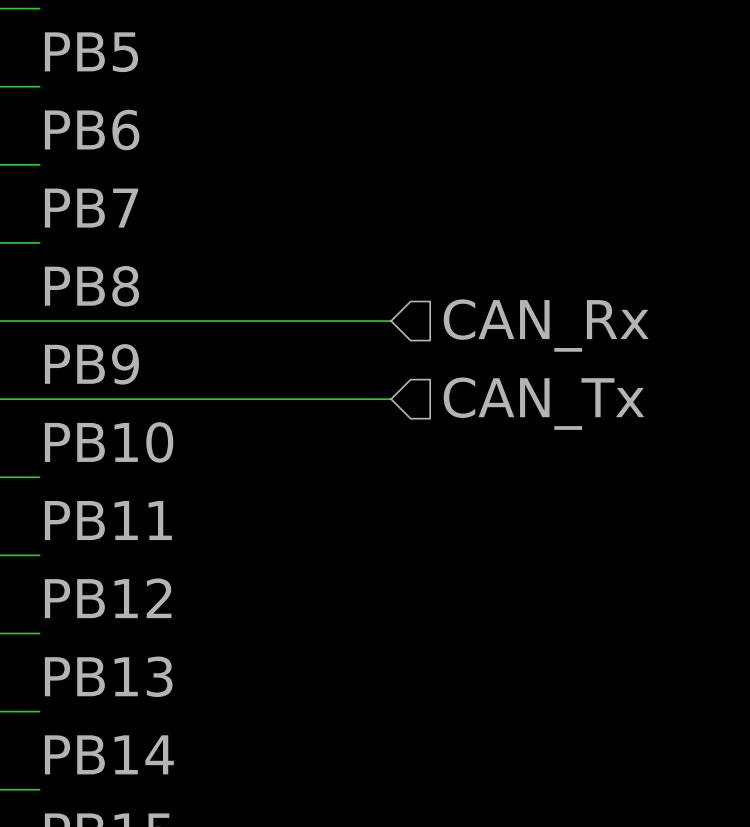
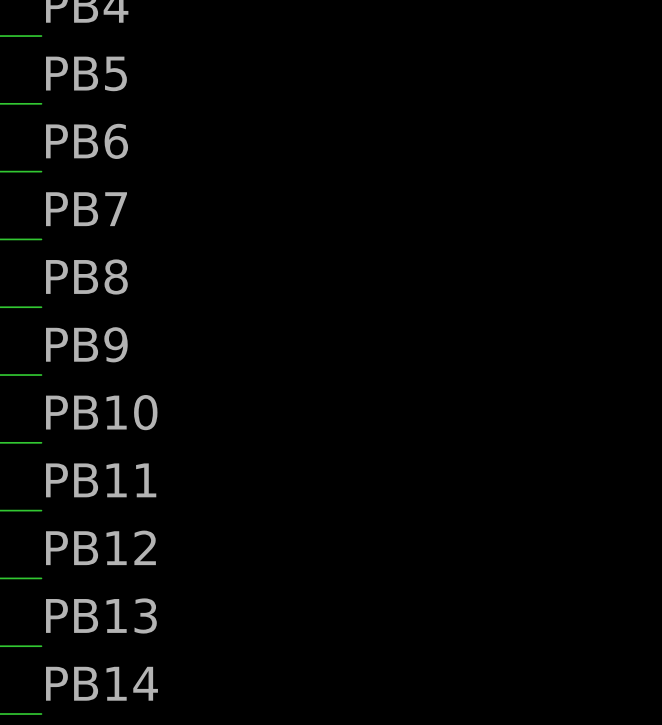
wire: (39, 321) (391, 321) -> none
hierarchical label: CAN_Rx (546, 325) -> none
wire: (39, 399) (391, 399) -> none
hierarchical label: CAN_Tx (544, 403) -> none

